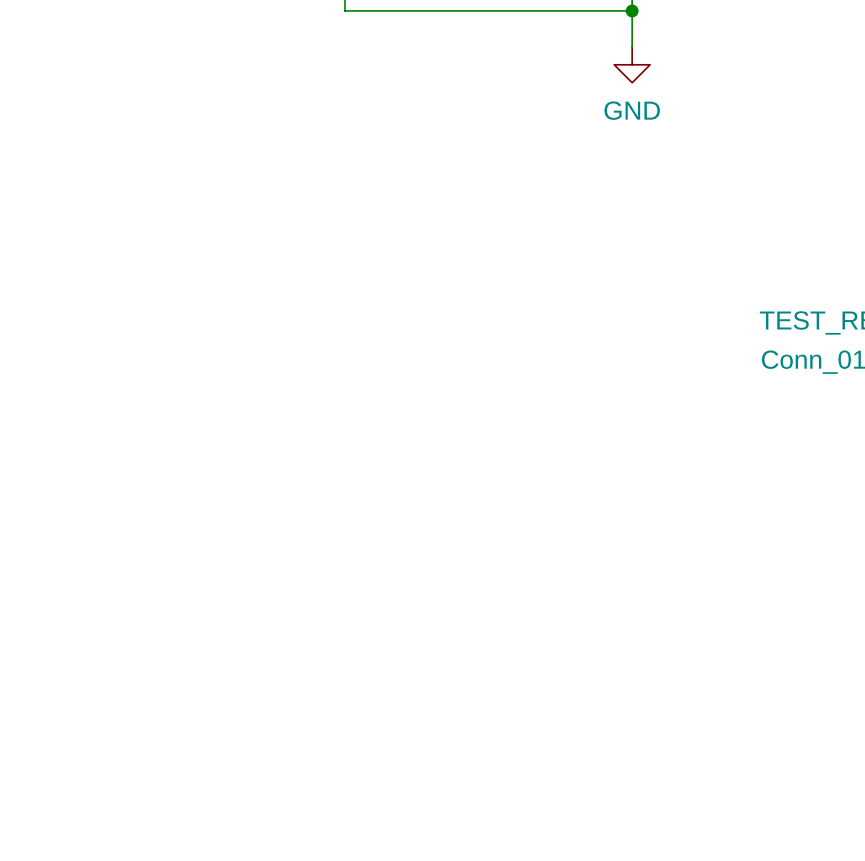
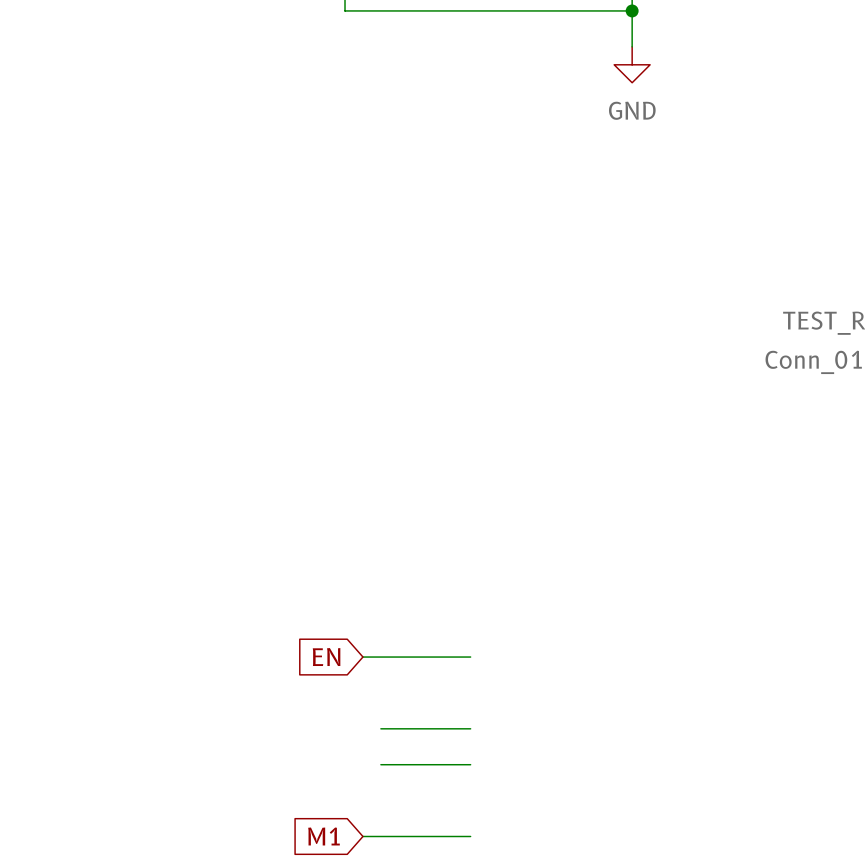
global label: none -> EN (326, 657)
wire: none -> (362, 657) (470, 657)
wire: none -> (380, 728) (470, 728)
wire: none -> (380, 764) (470, 764)
global label: none -> M1 (324, 836)
wire: none -> (362, 836) (470, 836)

